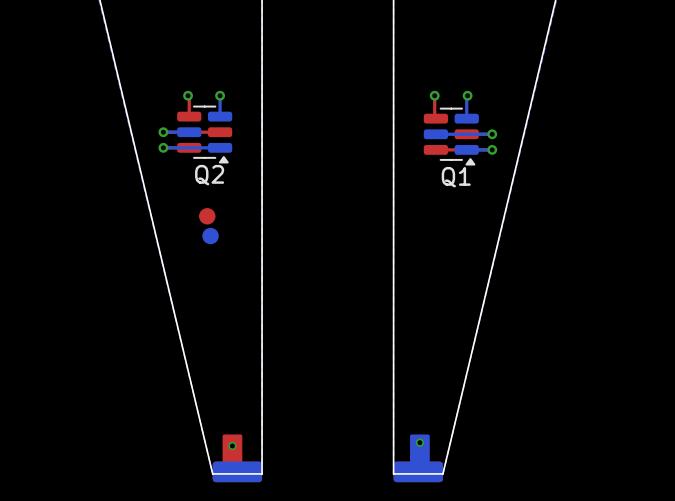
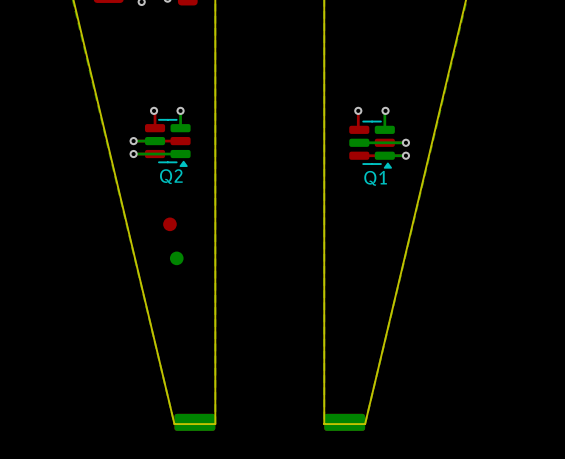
part: (207, 216) -> none
part side: bottom (210, 236) -> top (169, 224)
part: none -> (176, 258)
drawing: [222, 434, 243, 465] -> none
drawing: [410, 434, 430, 465] -> none
via: (419, 442) -> none
via: (232, 445) -> none

